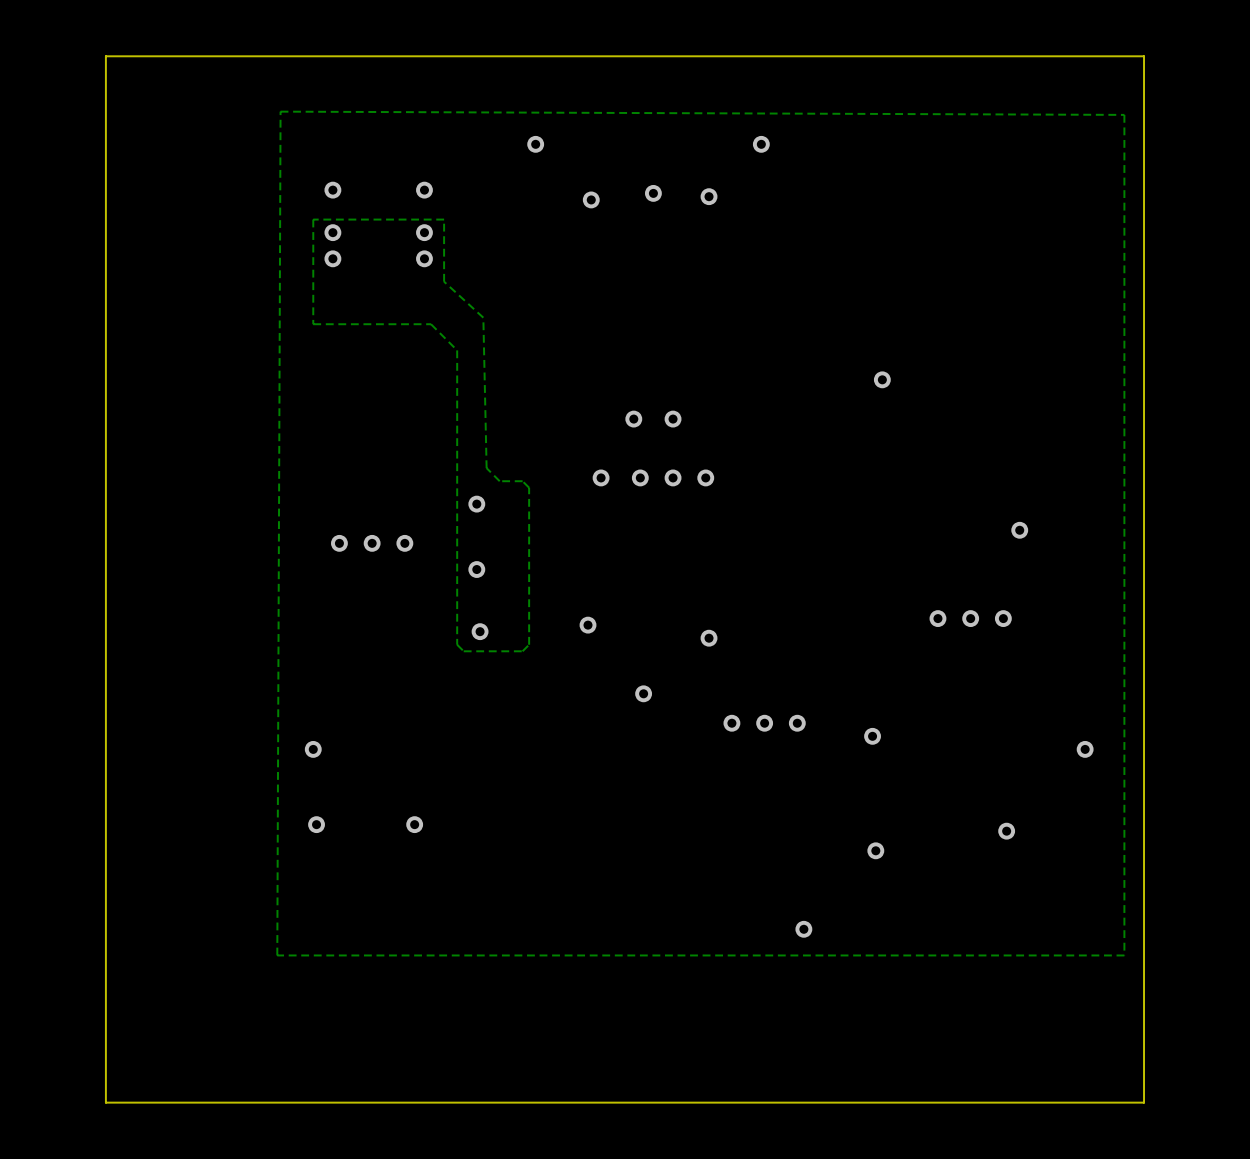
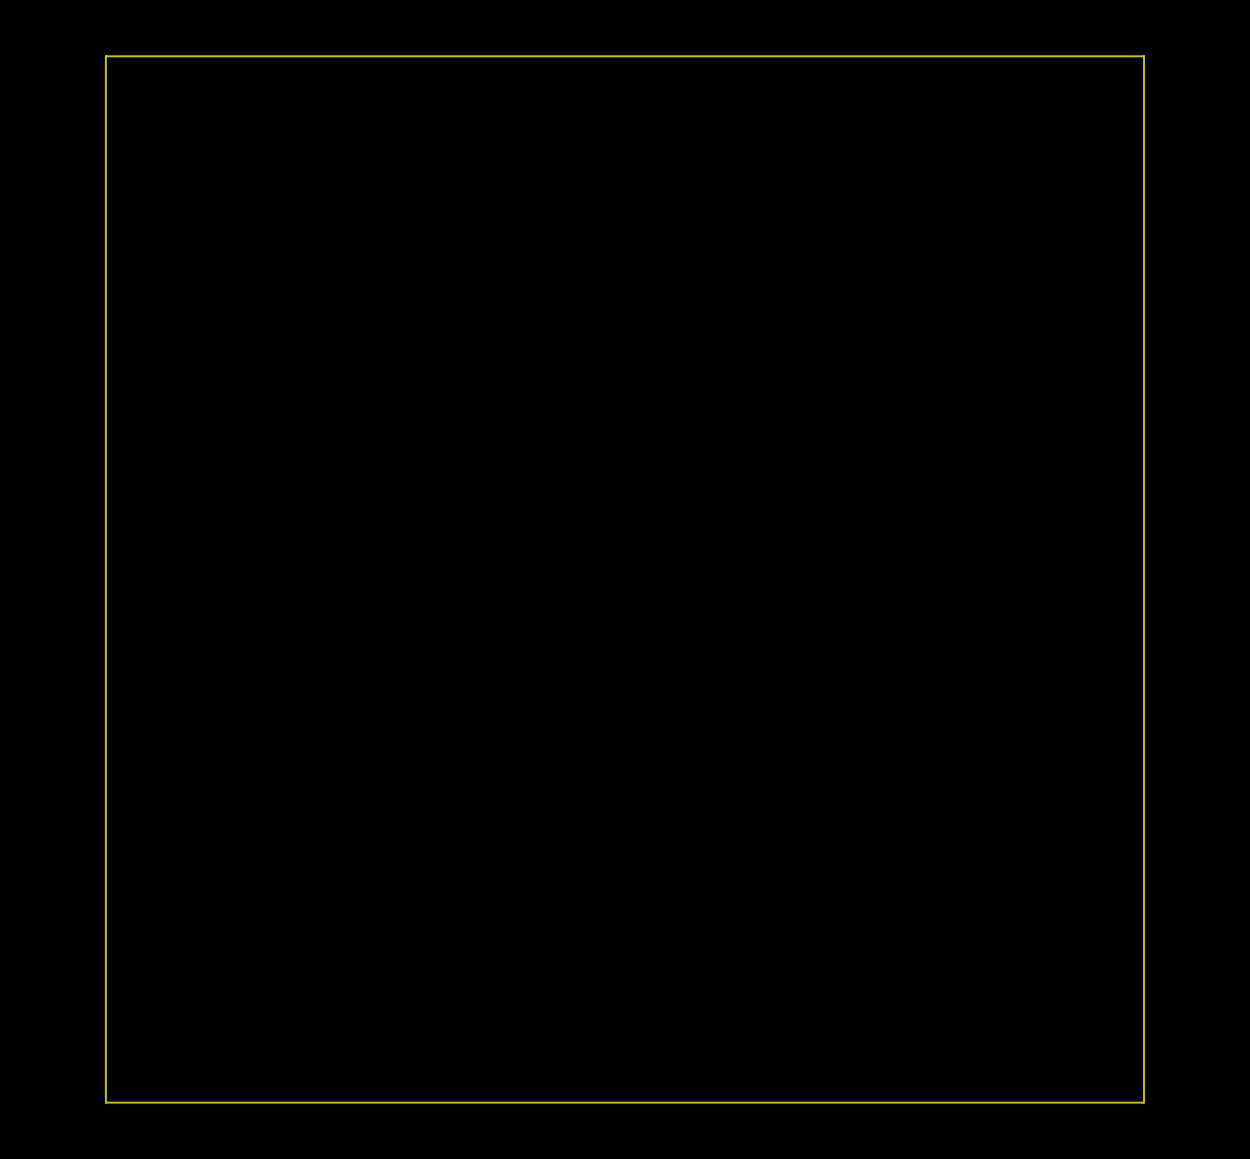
zone outline: (280, 111) (277, 955) (1124, 955) (1124, 114) (280, 111) -> none
via: (535, 144) -> none
via: (761, 144) -> none
via: (332, 190) -> none
via: (424, 190) -> none
via: (653, 193) -> none
via: (709, 196) -> none
via: (591, 199) -> none
zone outline: (444, 219) (444, 281) (483, 317) (486, 468) (499, 481) (522, 481) (529, 487) (529, 644) (522, 651) (463, 651) (457, 644) (457, 350) (431, 324) (313, 324) (313, 219) (444, 219) -> none
via: (332, 232) -> none
via: (424, 232) -> none
via: (332, 258) -> none
via: (424, 258) -> none
via: (882, 379) -> none
via: (633, 419) -> none
via: (673, 419) -> none
via: (601, 477) -> none
via: (640, 477) -> none
via: (673, 477) -> none
via: (705, 477) -> none
via: (476, 504) -> none
via: (1019, 530) -> none
via: (339, 543) -> none
via: (372, 543) -> none
via: (404, 543) -> none
via: (476, 569) -> none
via: (937, 618) -> none
via: (970, 618) -> none
via: (1003, 618) -> none
via: (588, 625) -> none
via: (480, 631) -> none
via: (709, 638) -> none
via: (643, 693) -> none
via: (731, 723) -> none
via: (764, 723) -> none
via: (797, 723) -> none
via: (872, 736) -> none
via: (313, 749) -> none
via: (1085, 749) -> none
via: (316, 824) -> none
via: (414, 824) -> none
via: (1006, 831) -> none
via: (875, 850) -> none
via: (803, 929) -> none

